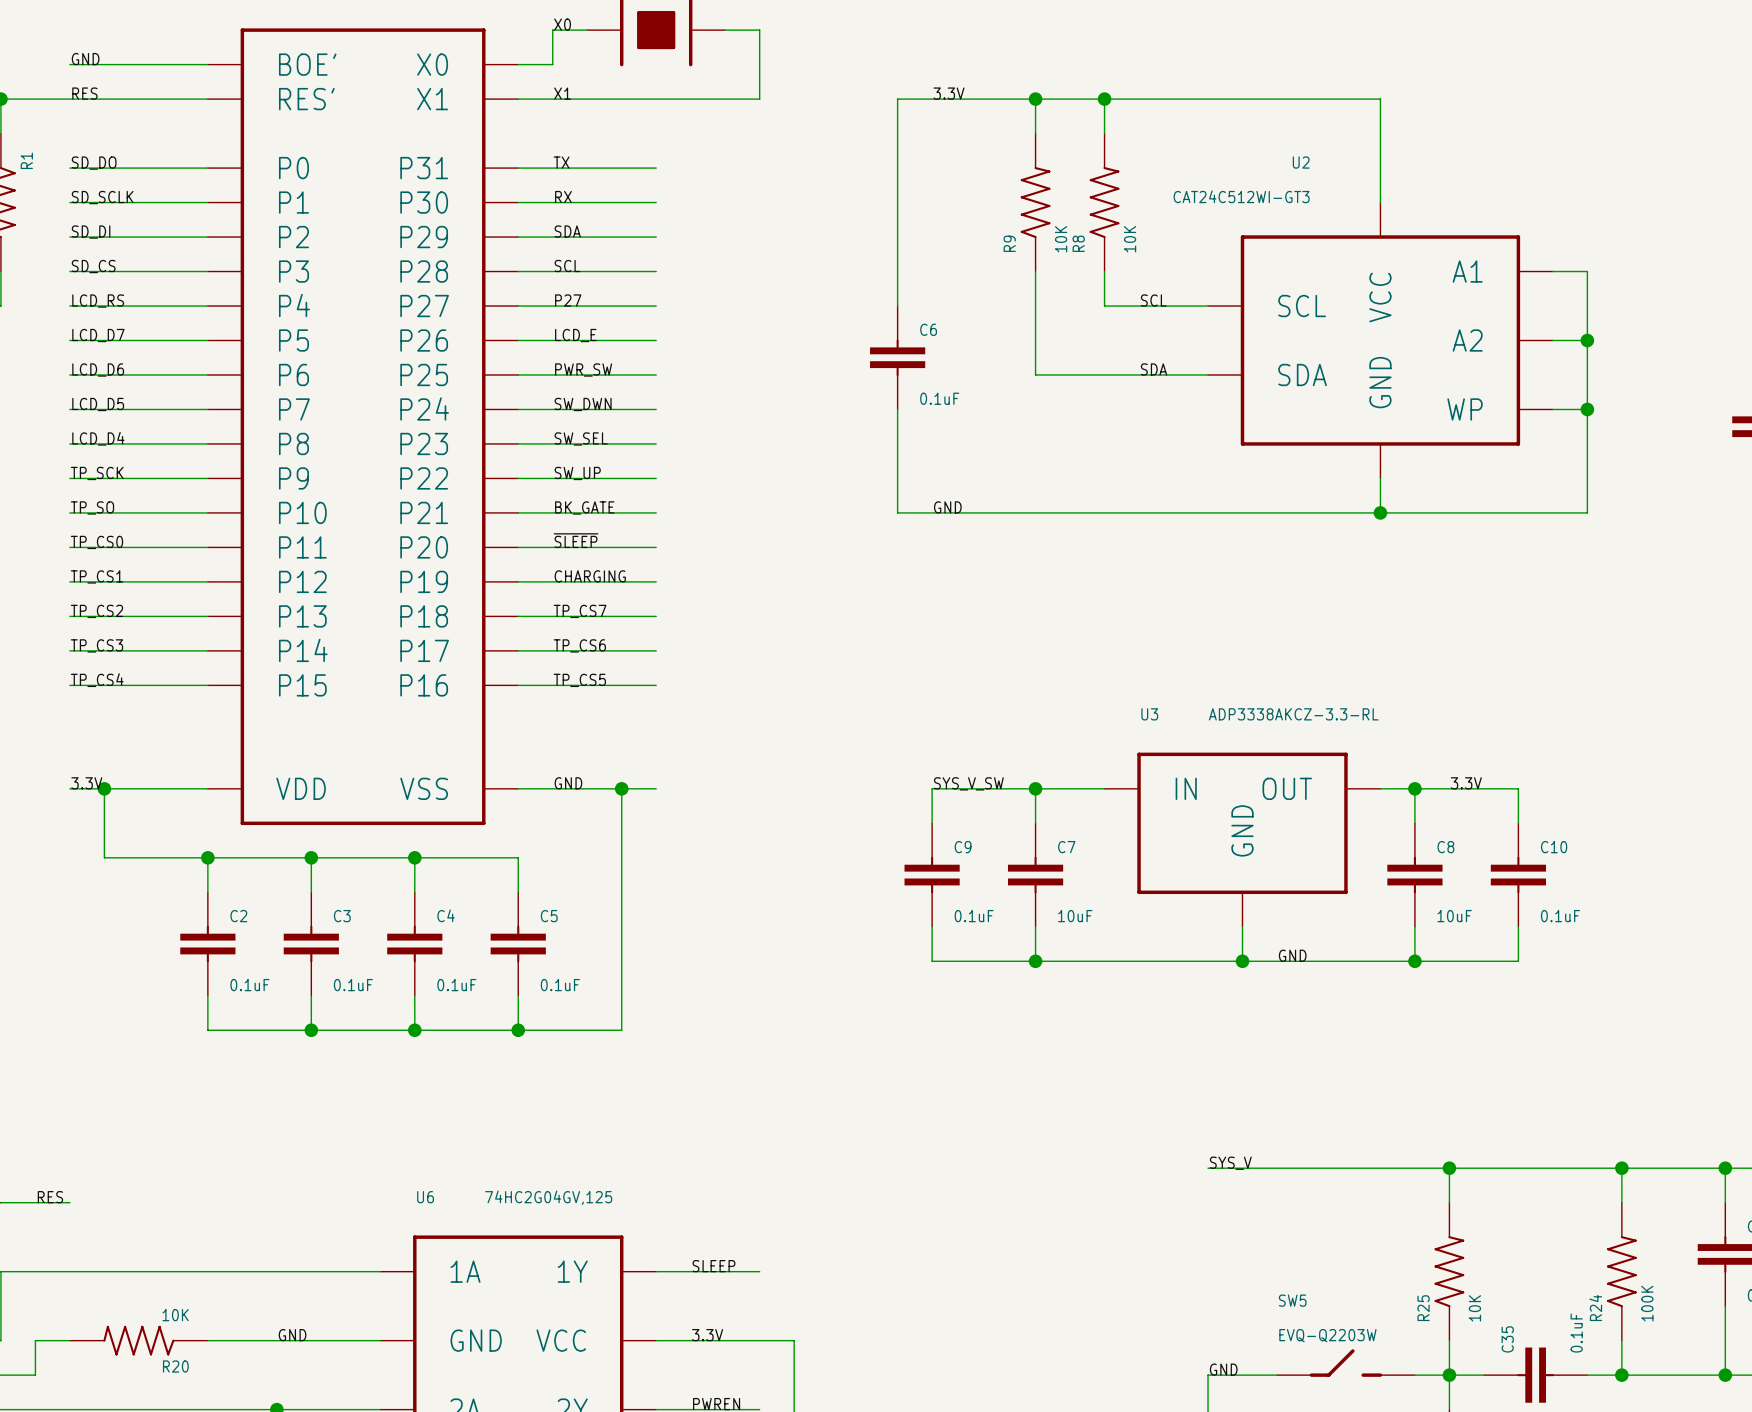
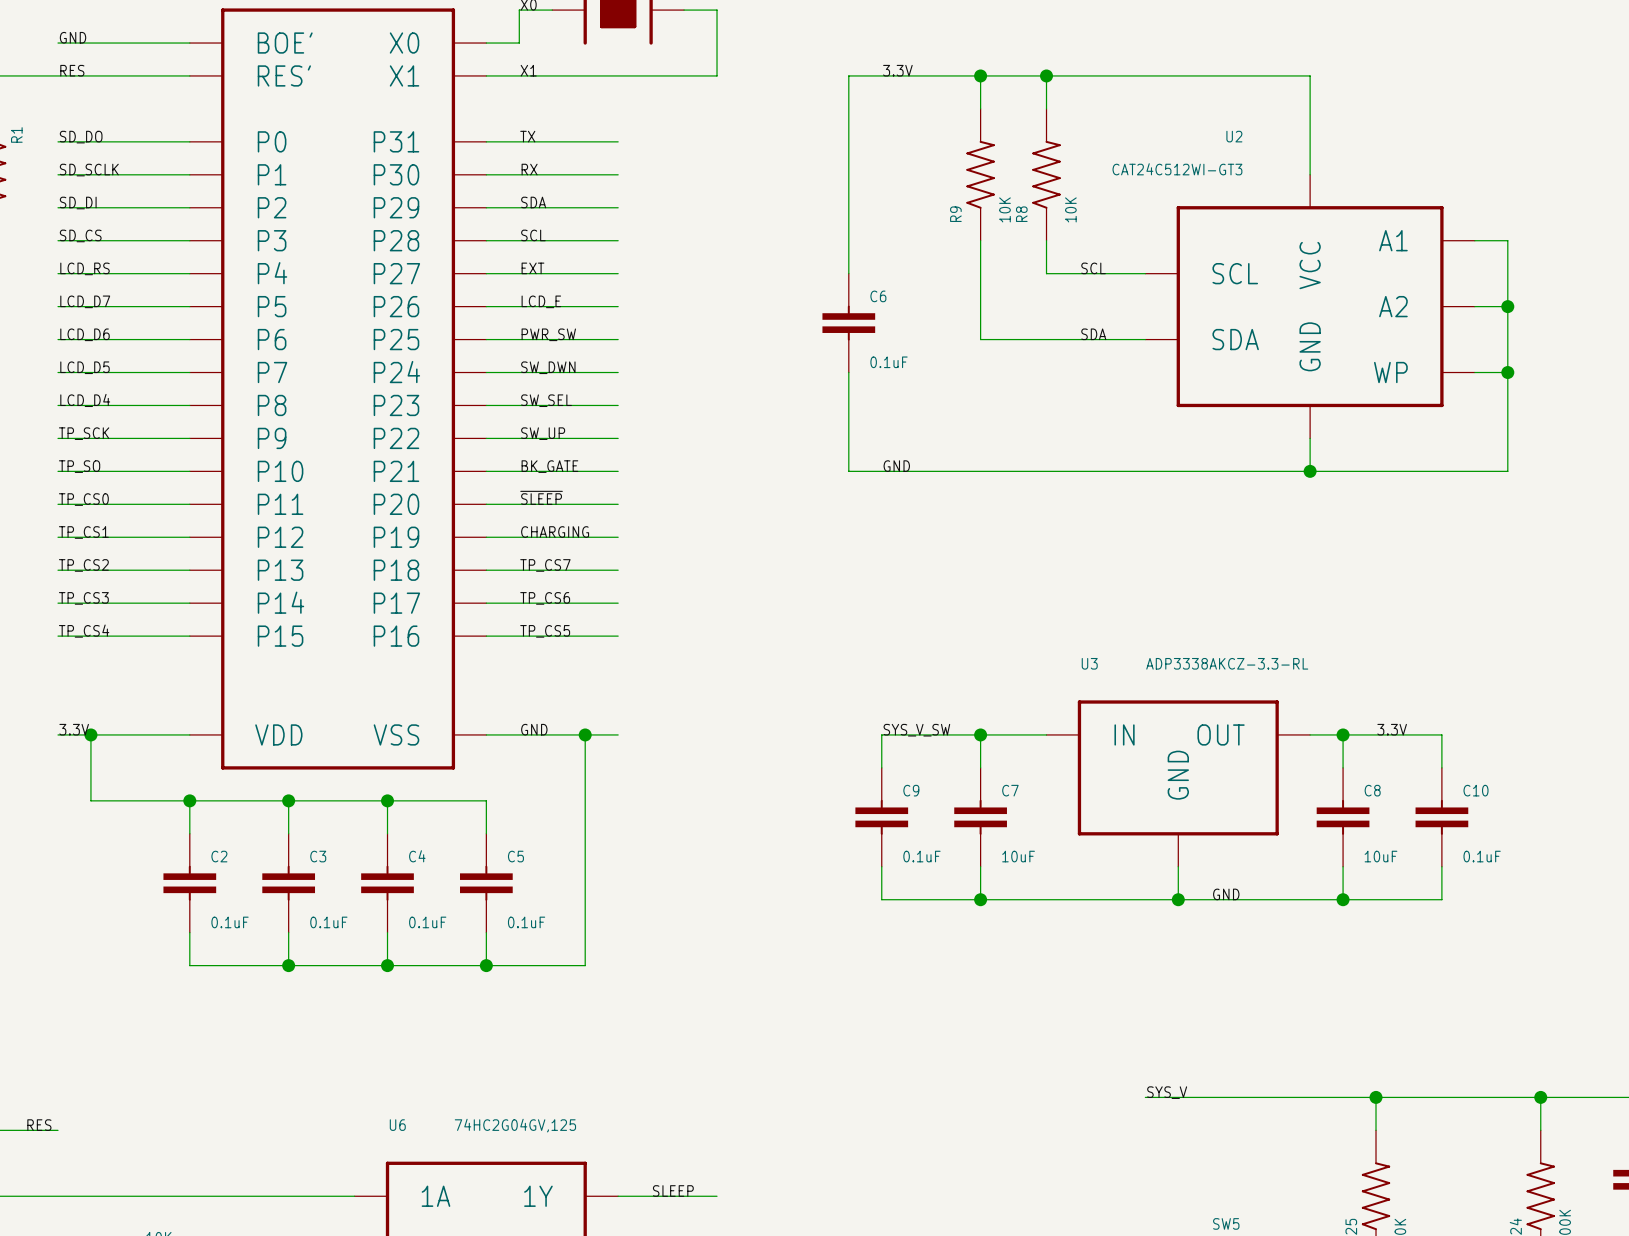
label: P27 (568, 300) -> EXT (532, 268)

